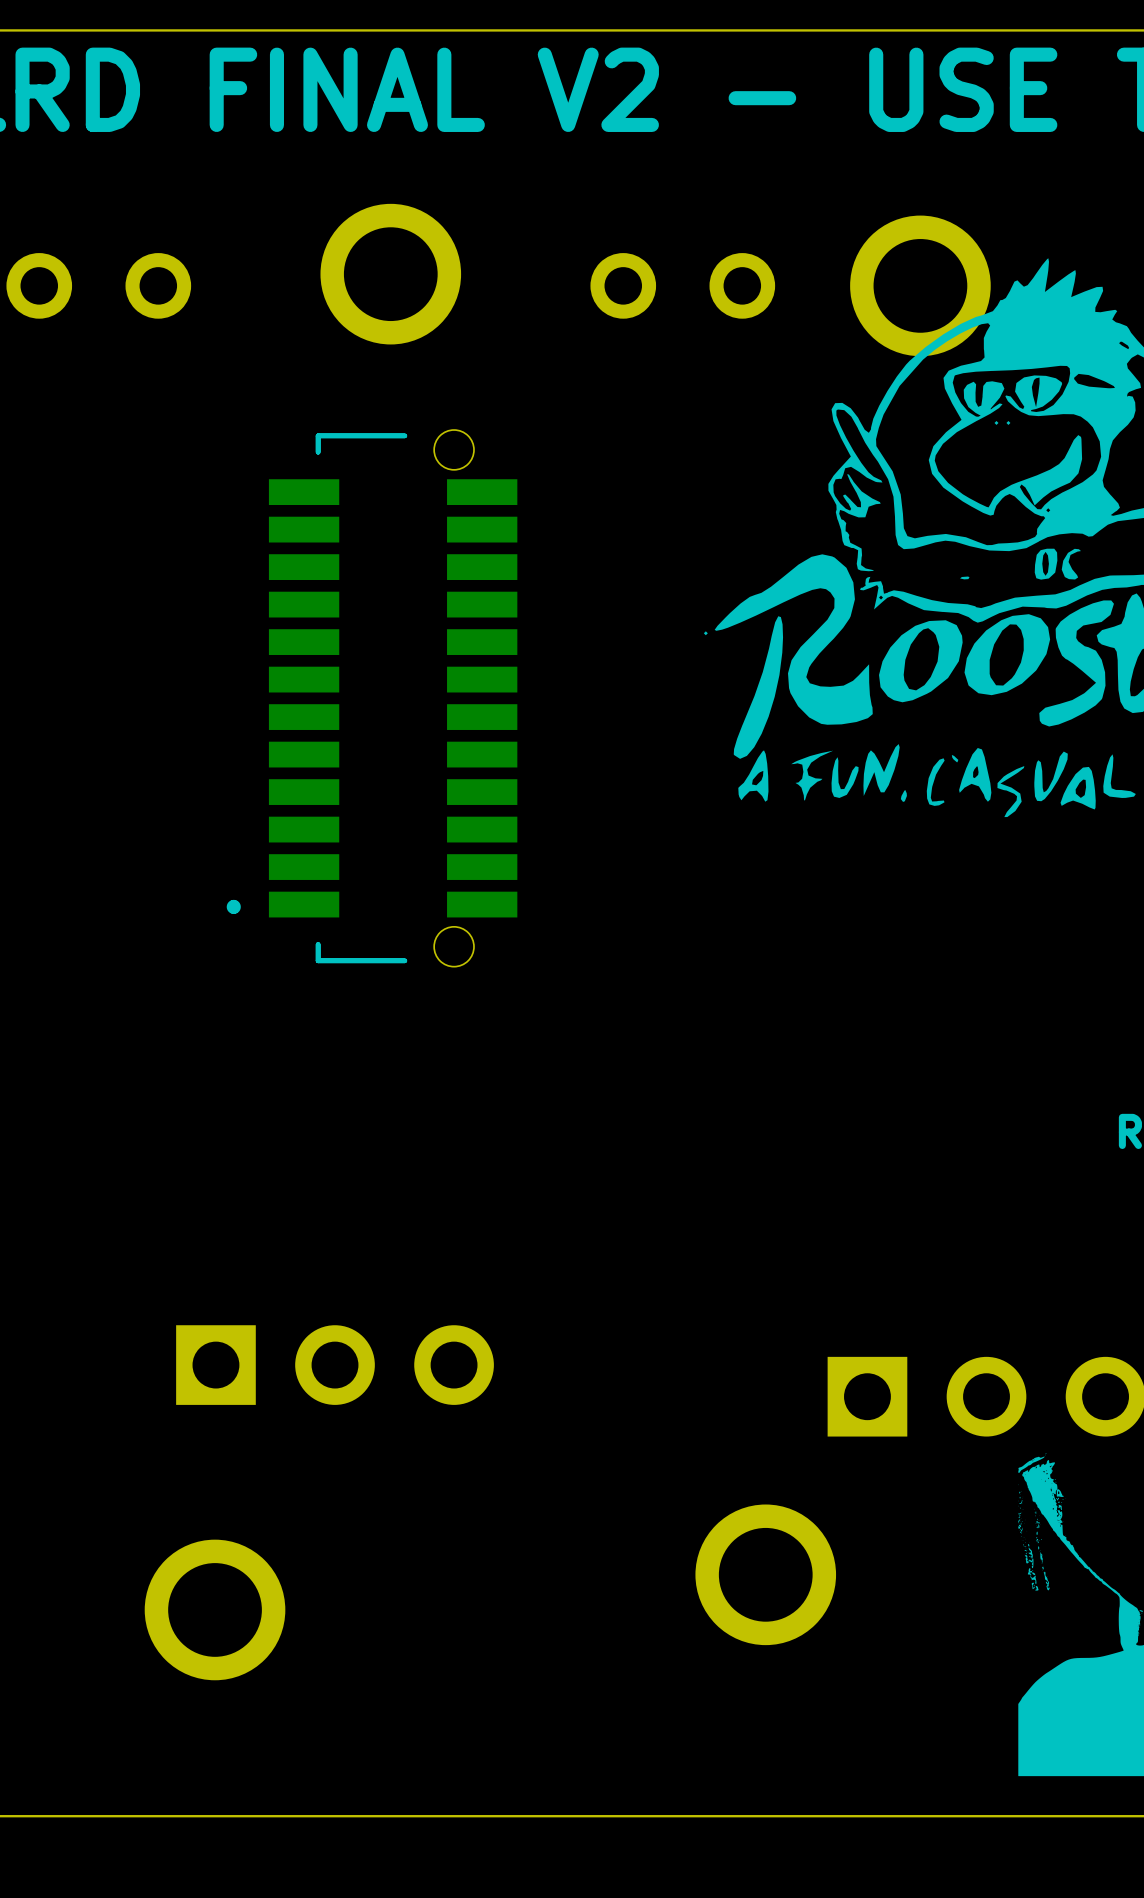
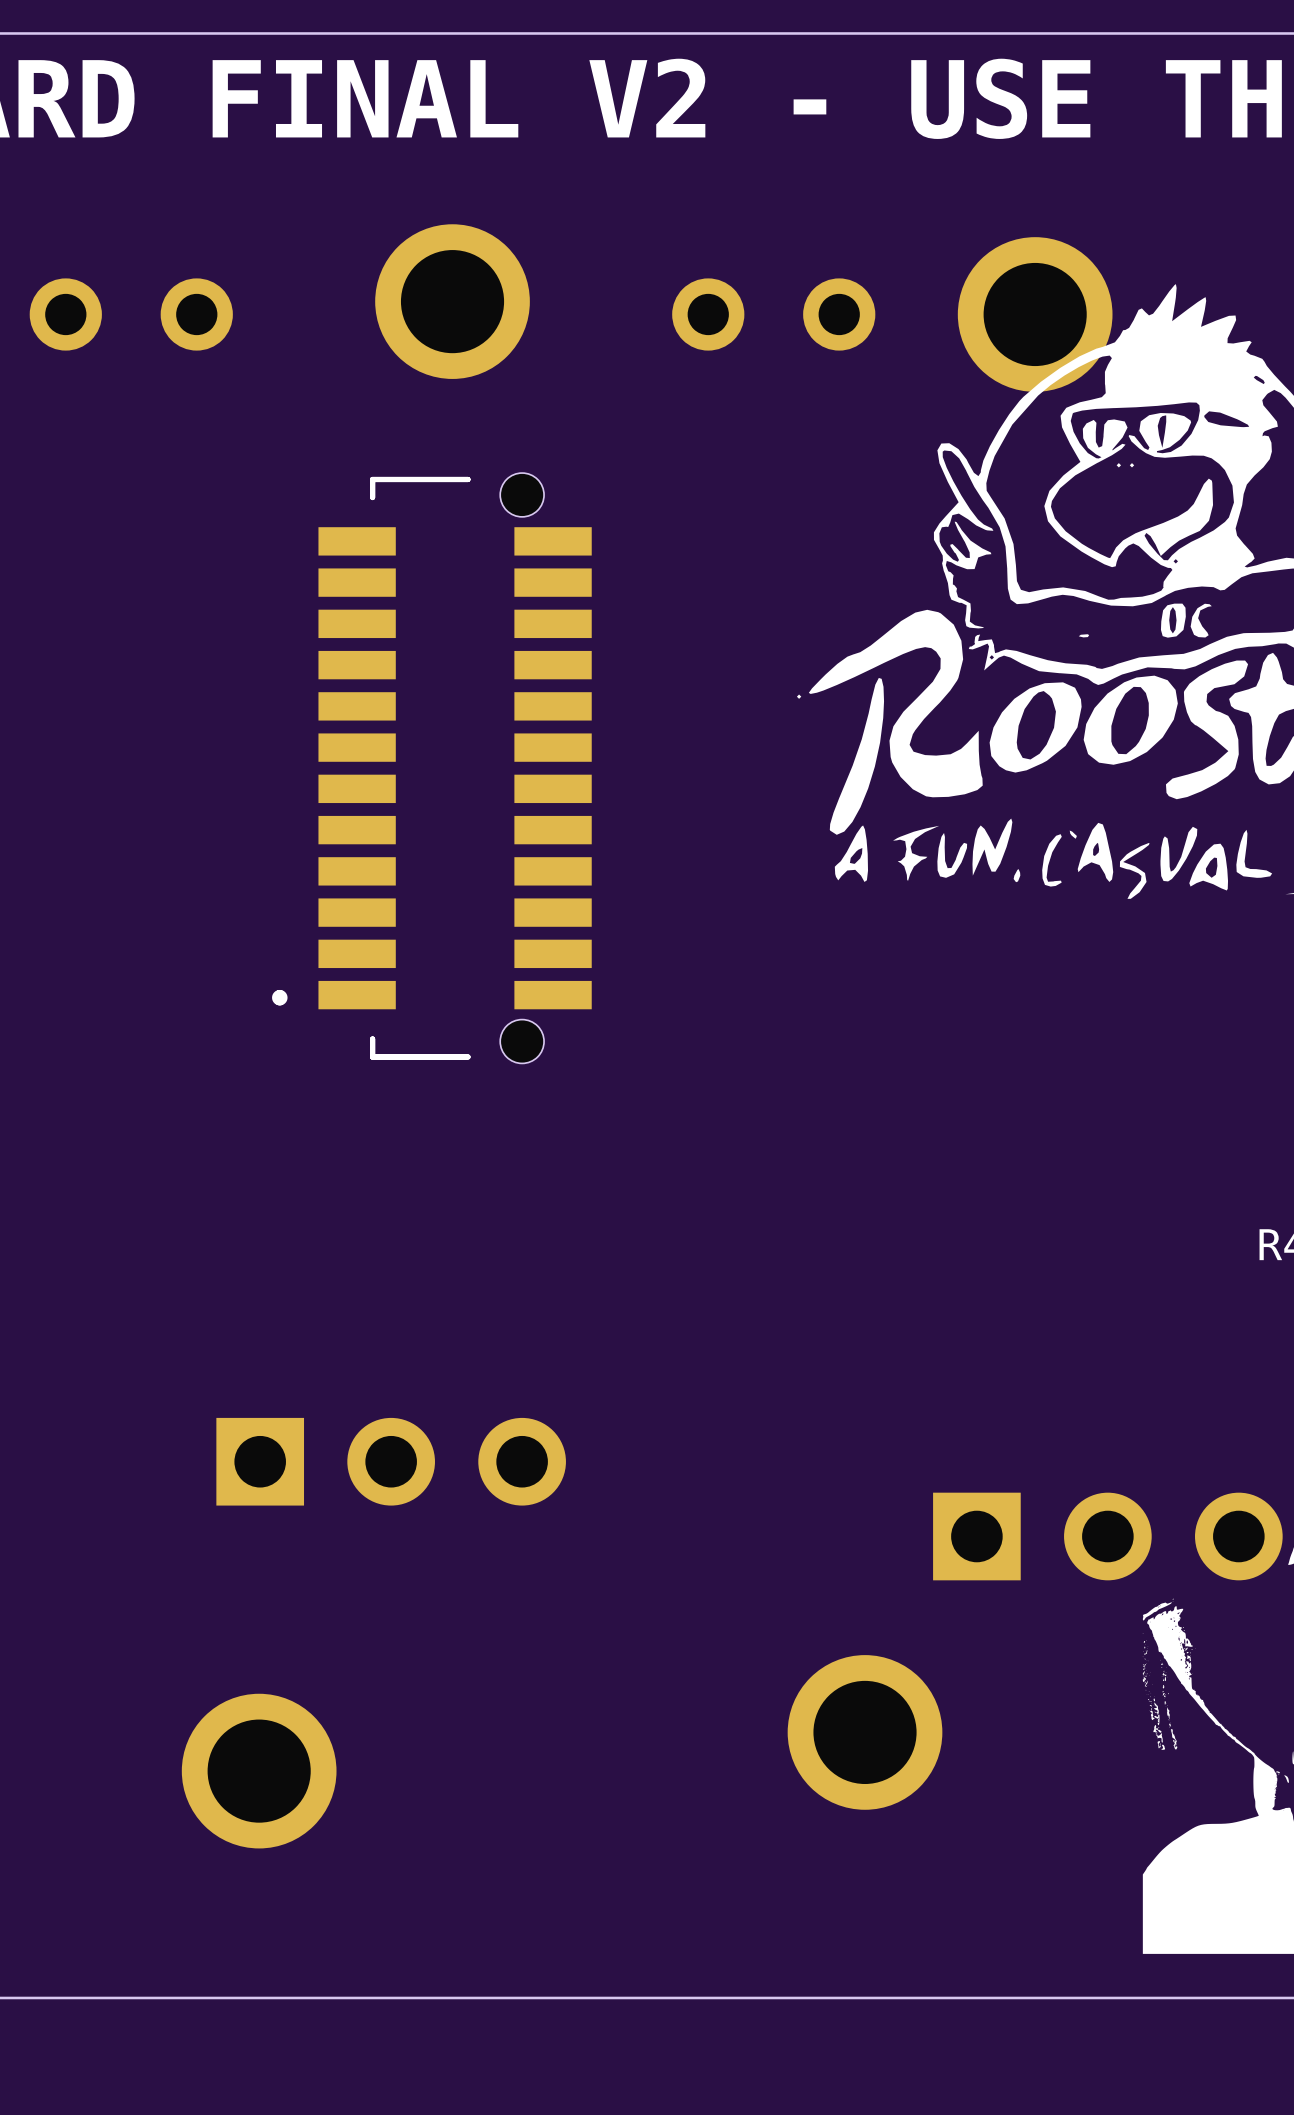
part position: (335, 1365) -> (391, 1461)

